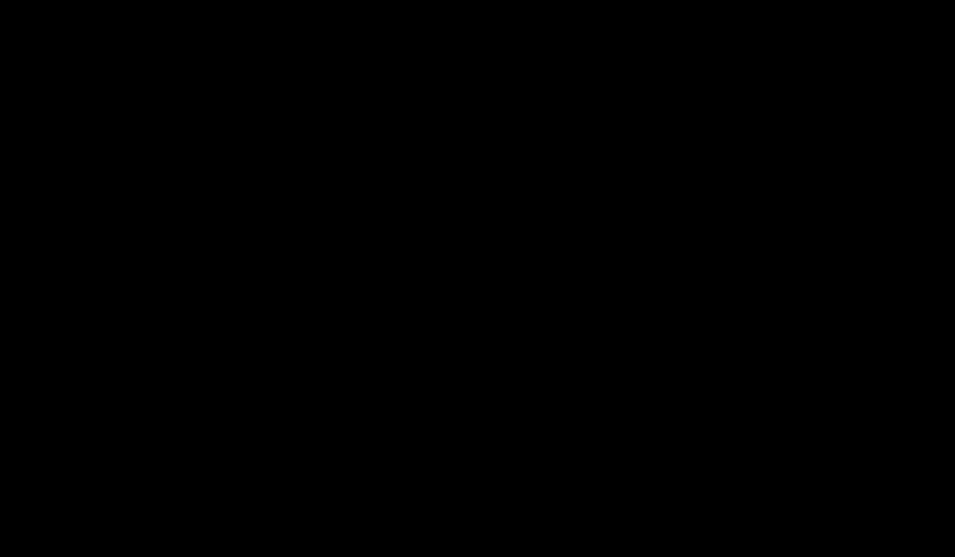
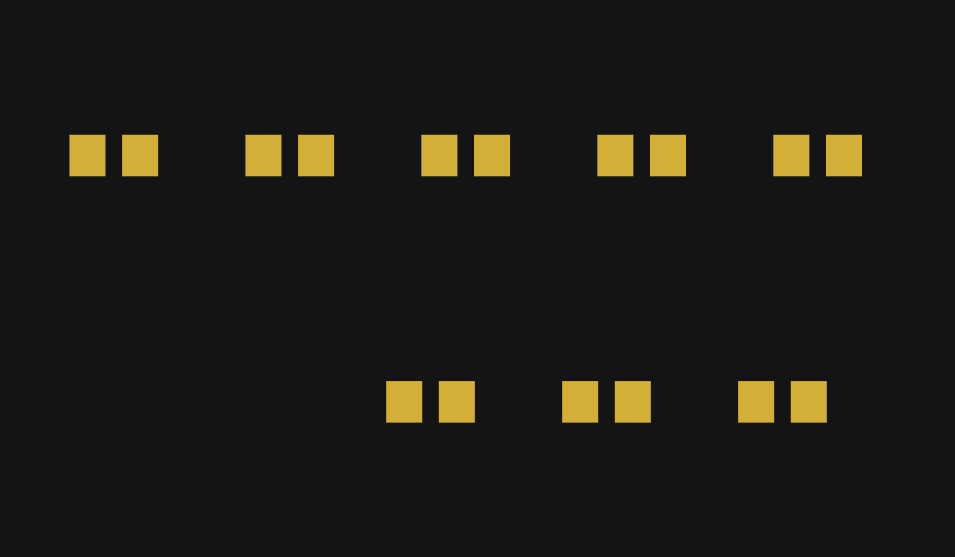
part: none -> (113, 155)
part: none -> (289, 155)
part: none -> (465, 155)
part: none -> (641, 155)
part: none -> (817, 155)
part: none -> (430, 401)
part: none -> (606, 401)
part: none -> (782, 401)

